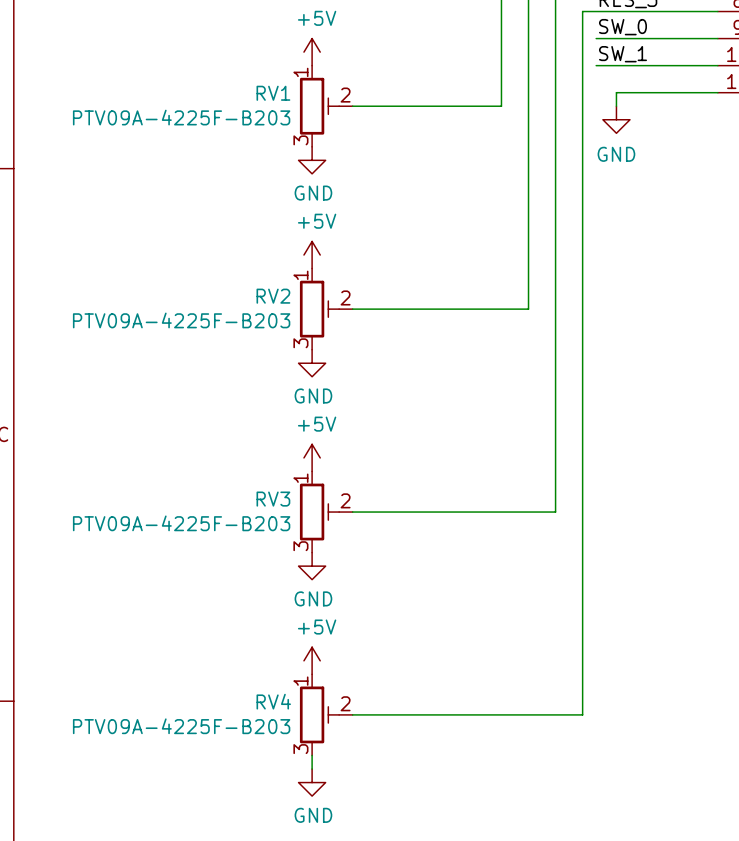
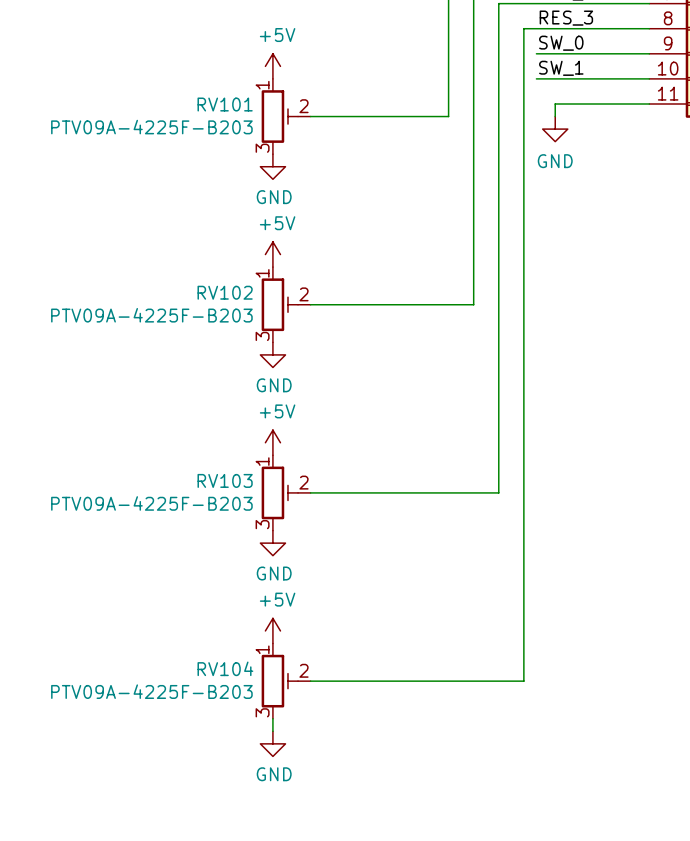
RV1 name: RV1 (273, 93) -> RV101 (225, 104)
RV2 name: RV2 (273, 296) -> RV102 (225, 292)
RV3 name: RV3 (273, 499) -> RV103 (225, 480)
RV4 name: RV4 (273, 701) -> RV104 (225, 668)

